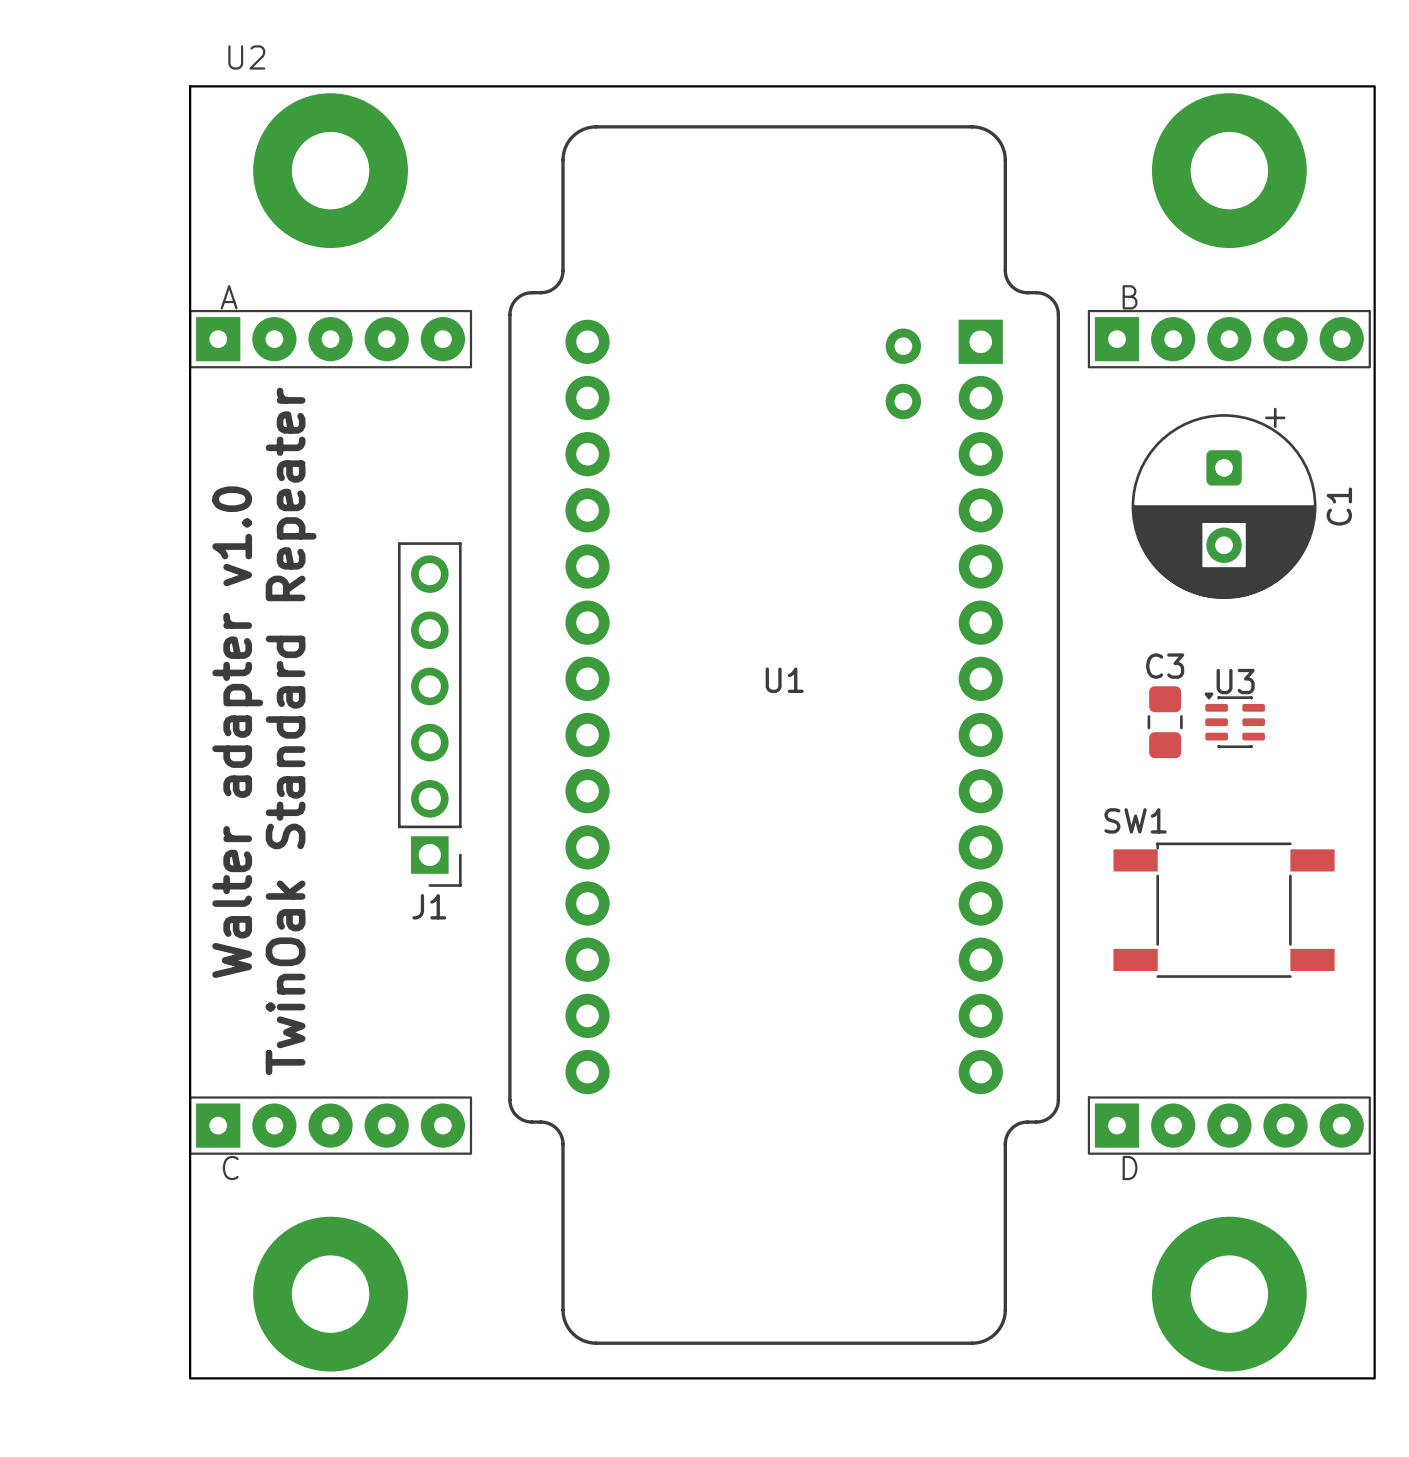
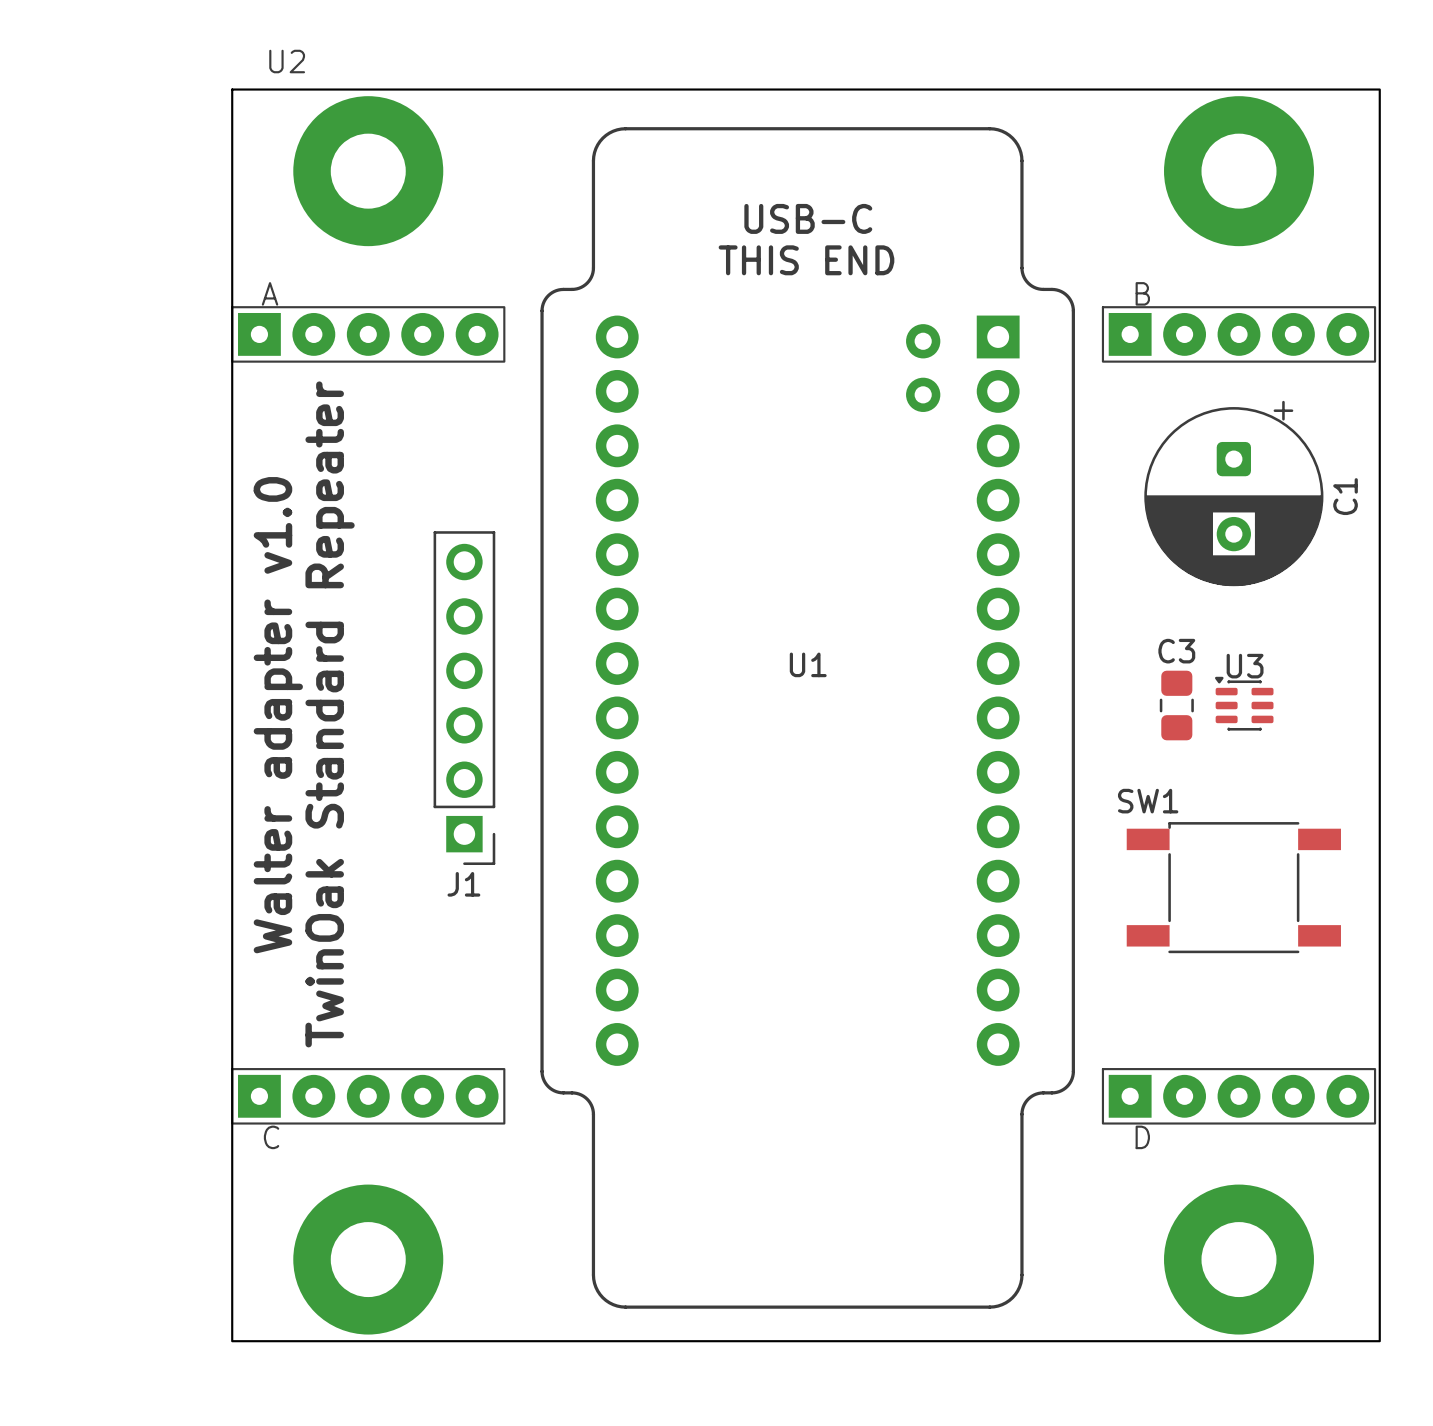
text: none -> USB-C (808, 218)
text: none -> THIS END (806, 260)

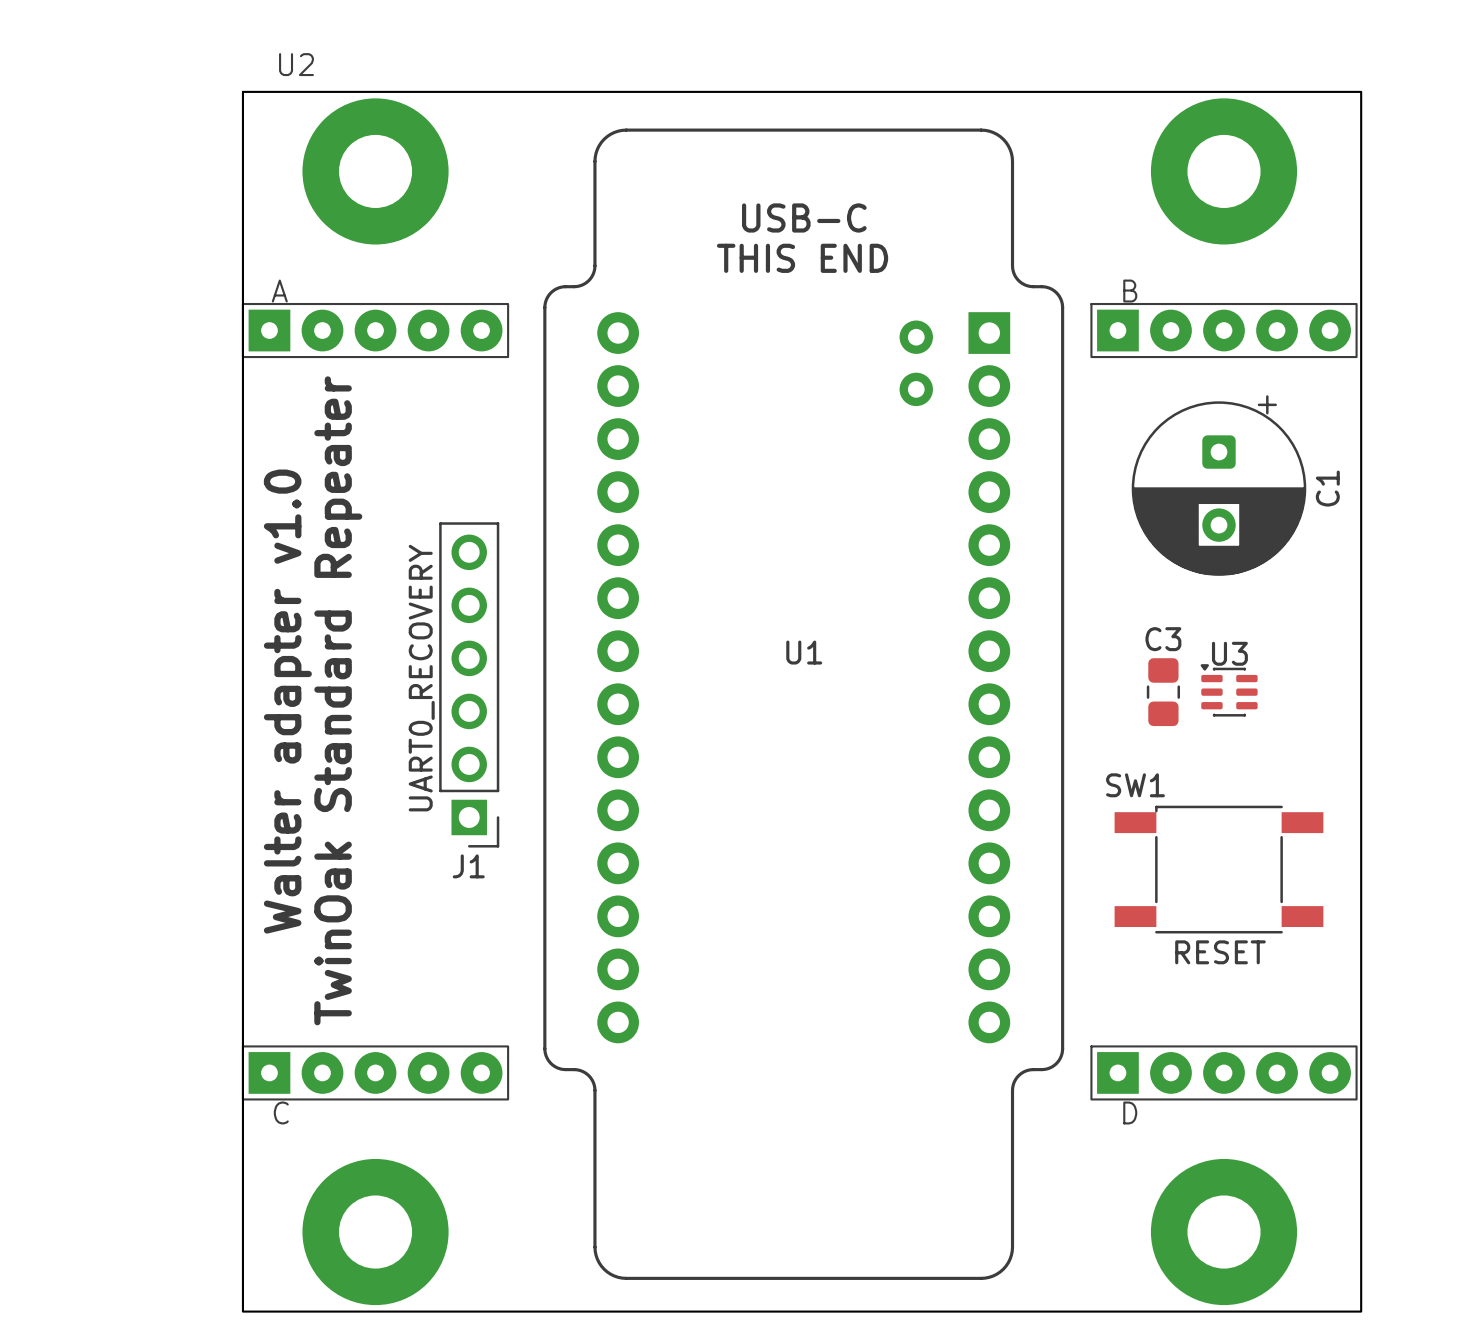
J1 value: none -> UART0_RECOVERY (421, 678)
SW1 value: none -> RESET (1220, 952)

